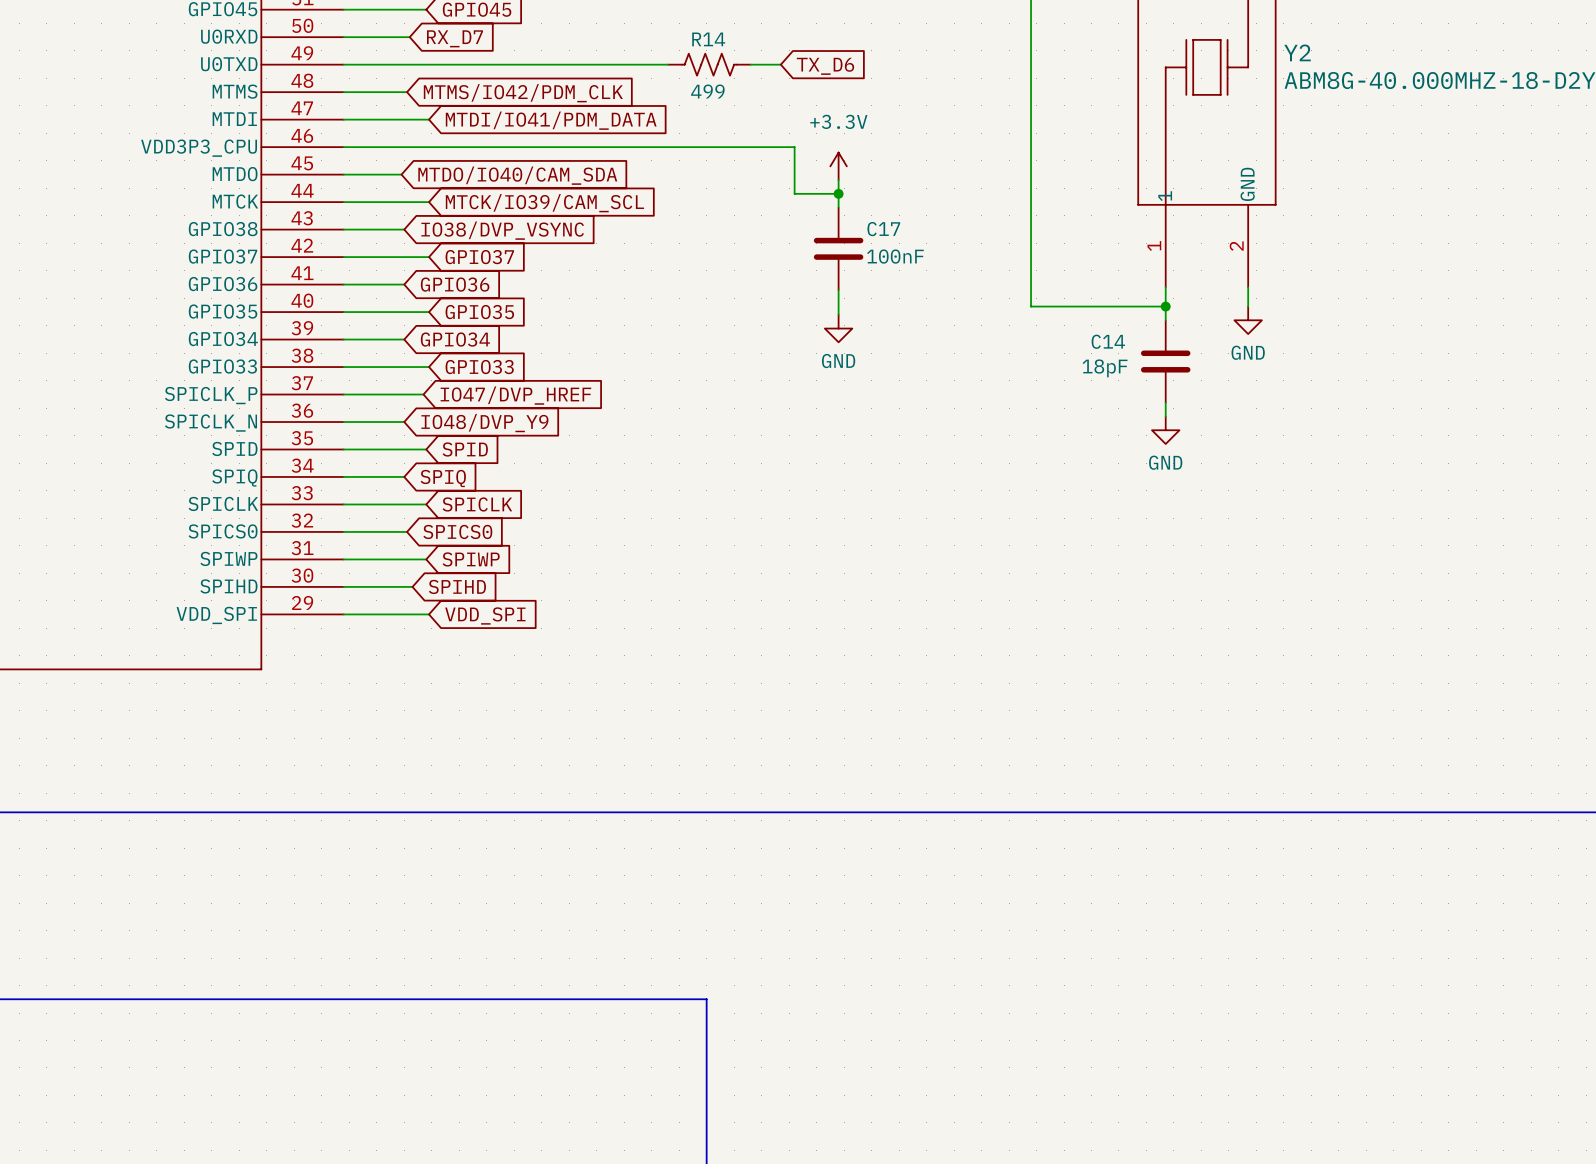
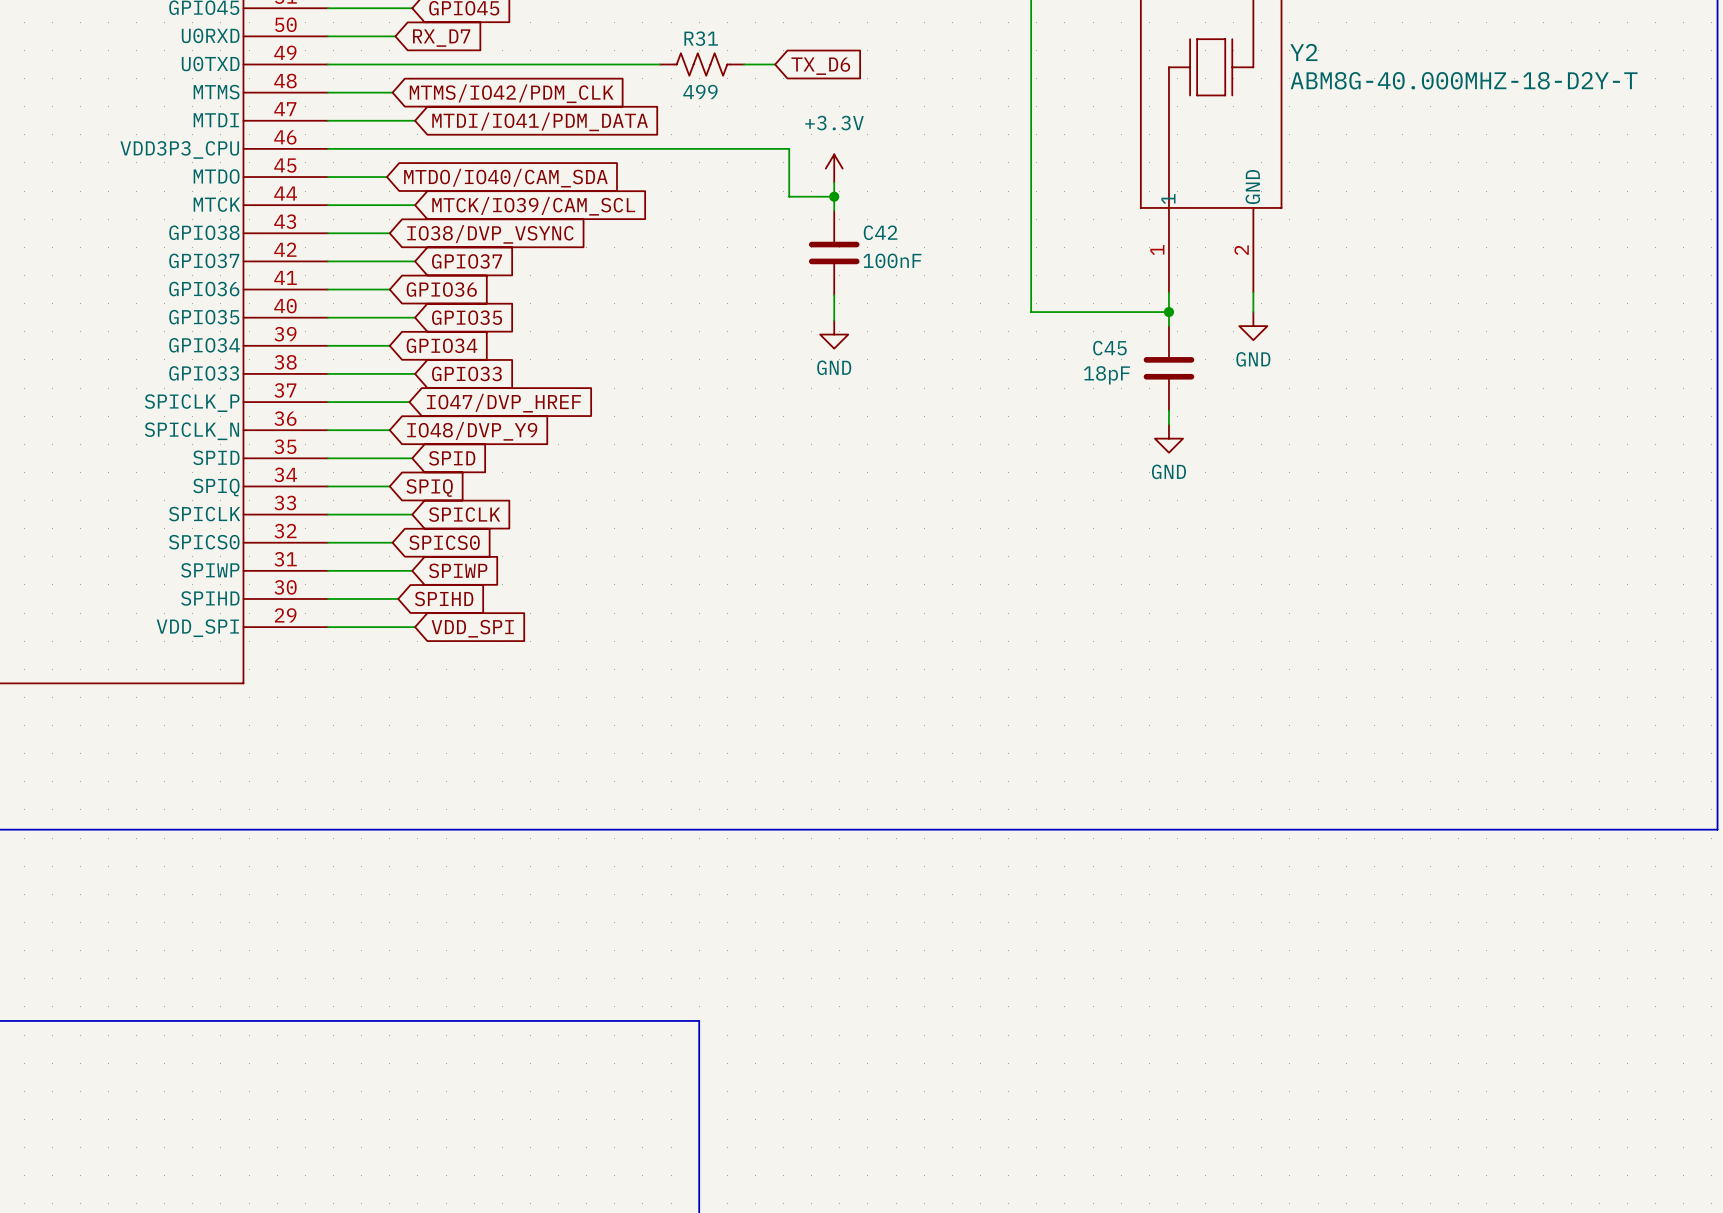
R14 name: R14 (708, 39) -> R31 (701, 38)
C17 name: C17 (883, 229) -> C42 (880, 232)
C14 name: C14 (1108, 341) -> C45 (1109, 348)

